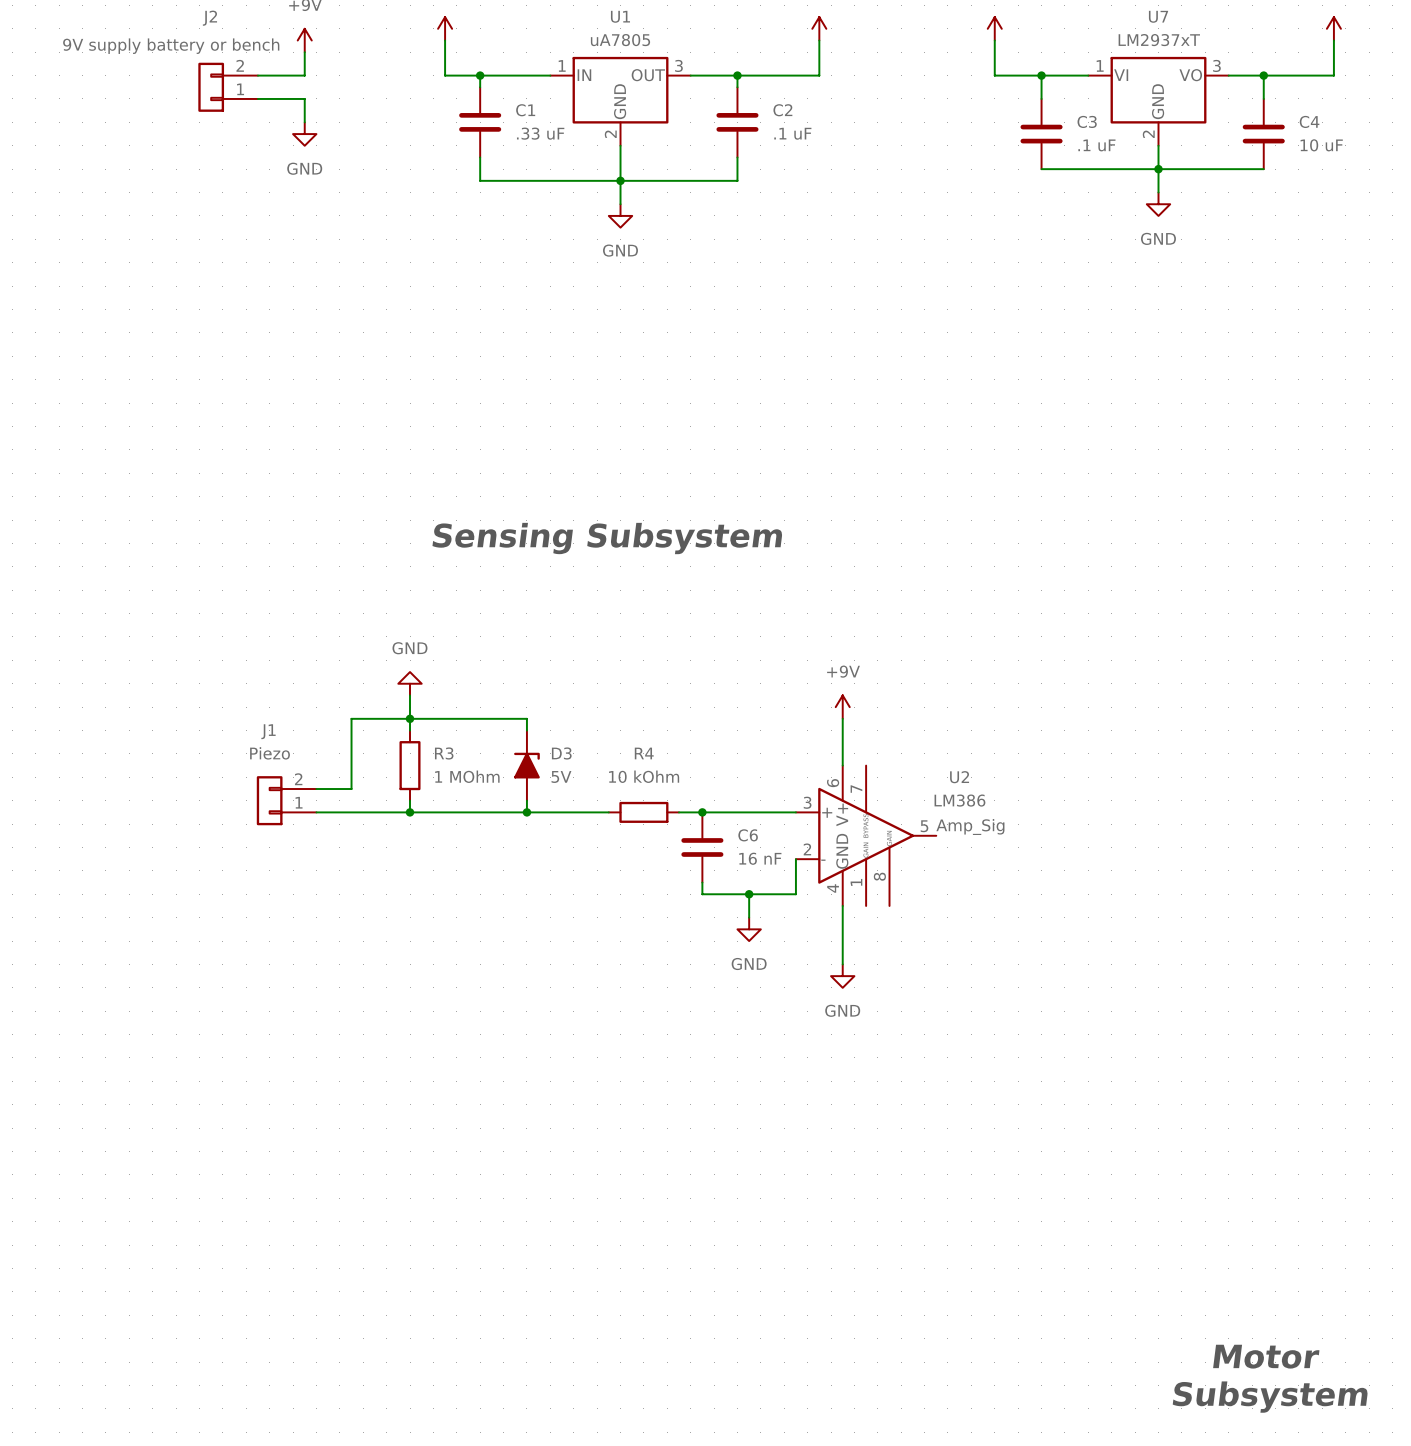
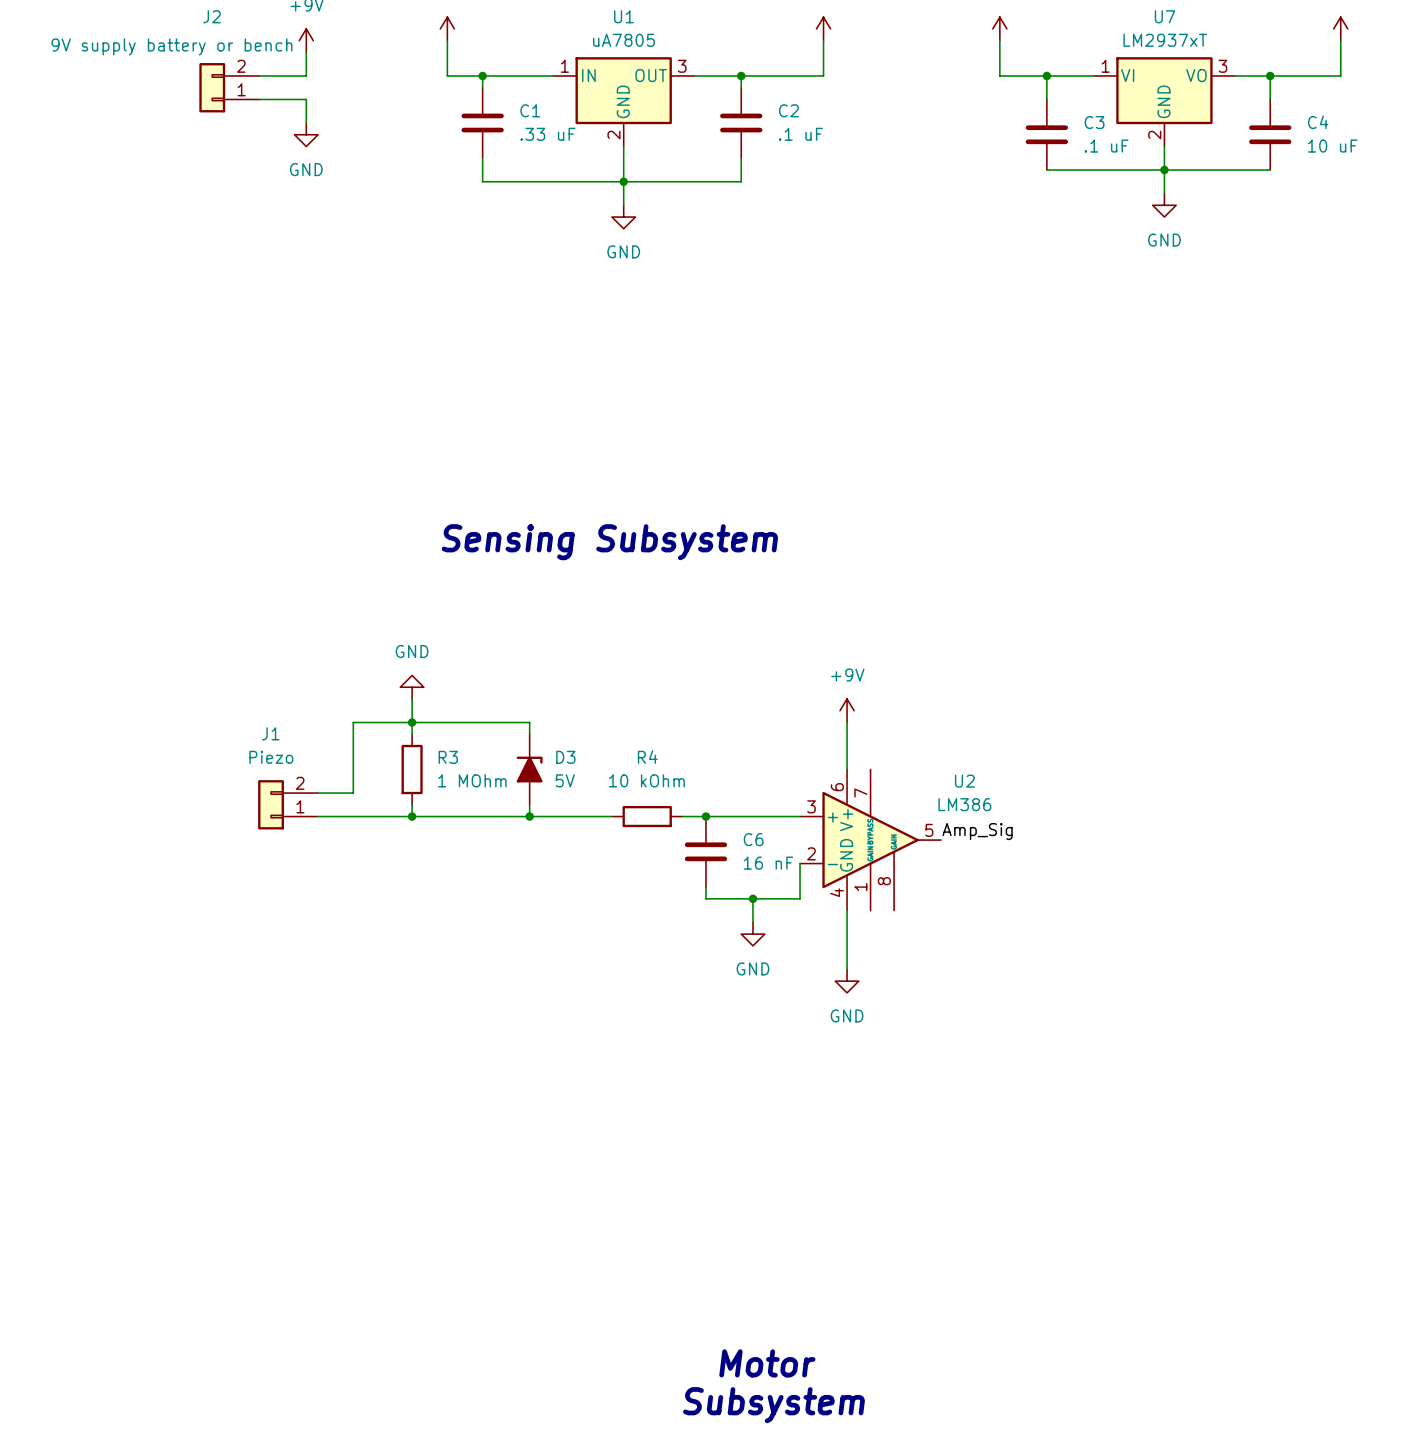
text: none -> Motor (767, 1363)
text: Motor (1266, 1356) -> none
text: none -> Subsystem (773, 1405)
text: Subsystem (1270, 1397) -> none

